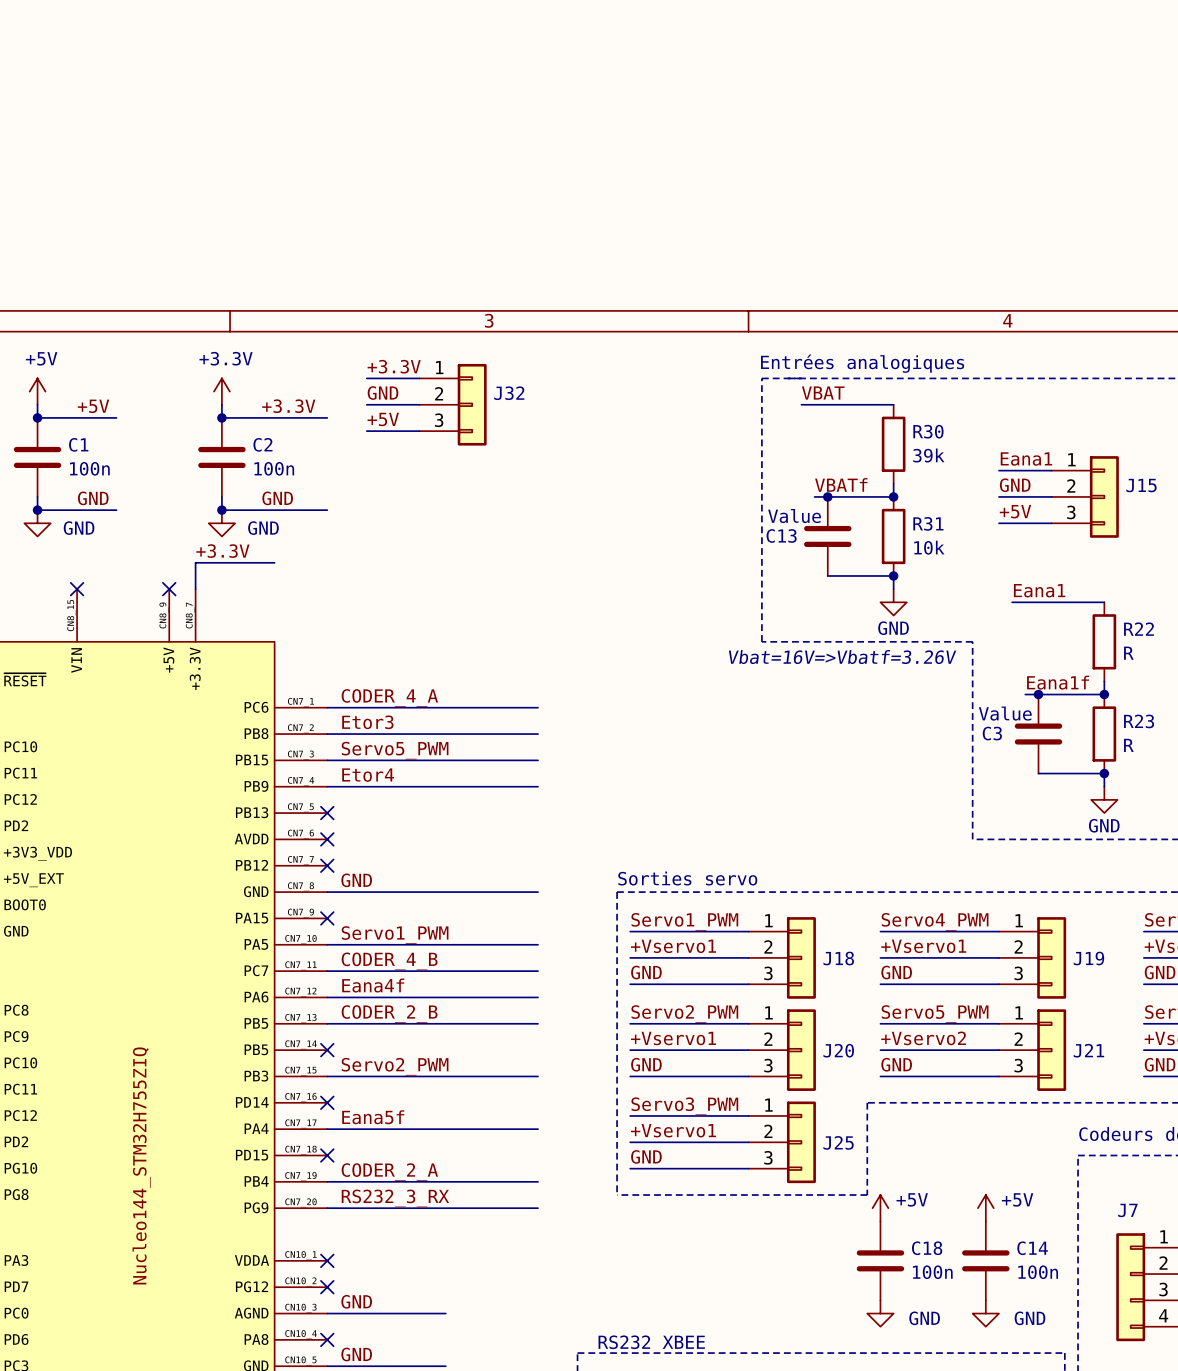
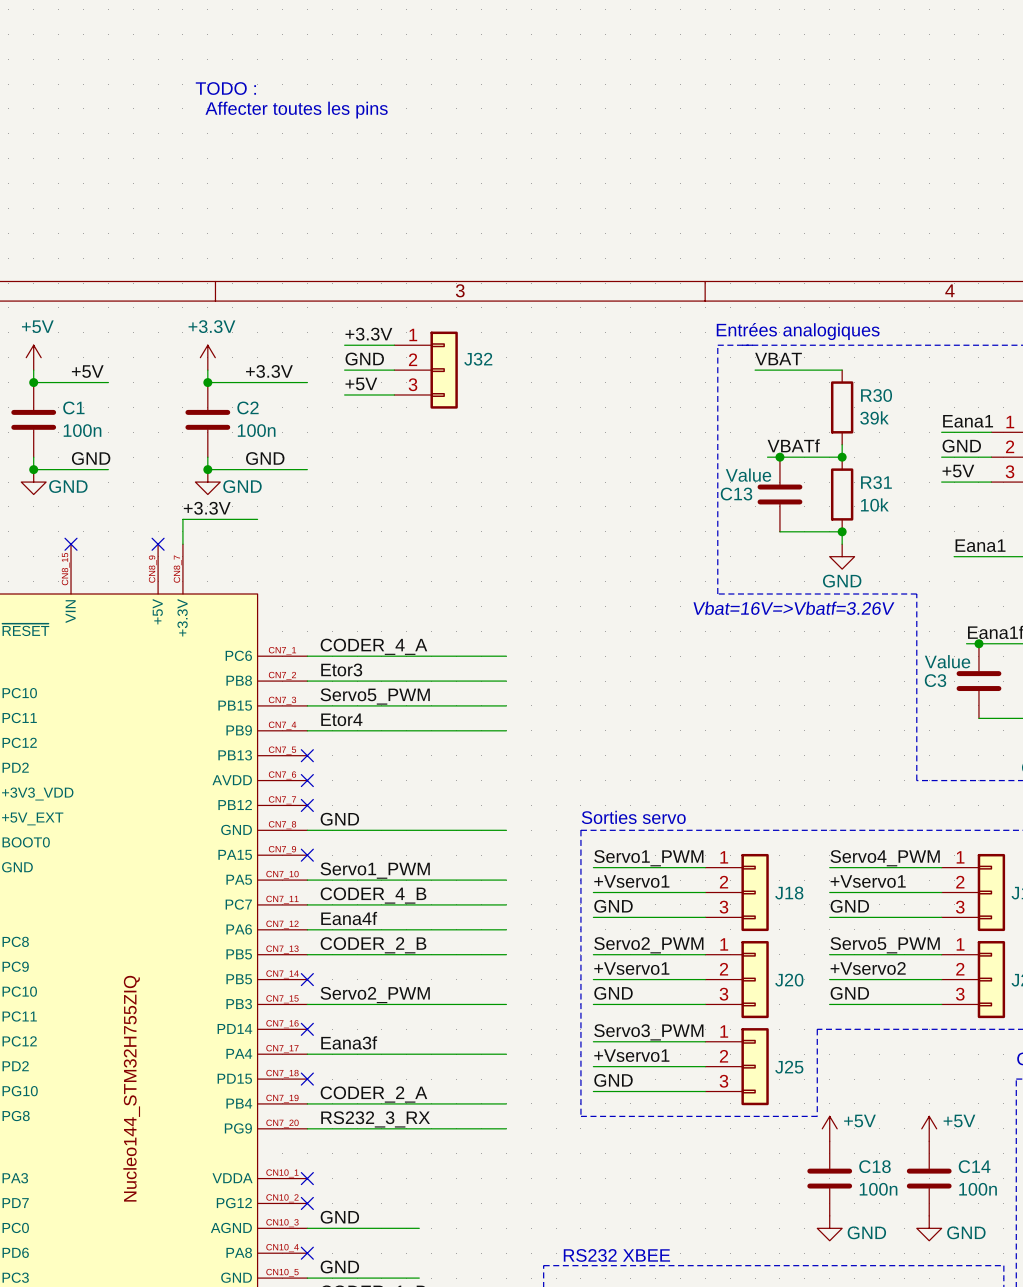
text: none -> TODO : (225, 88)
text: none -> Affecter toutes les pins (296, 110)
label: Eana5f (373, 1117) -> Eana3f (349, 1042)

